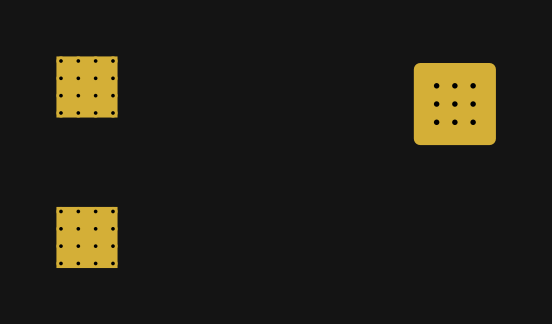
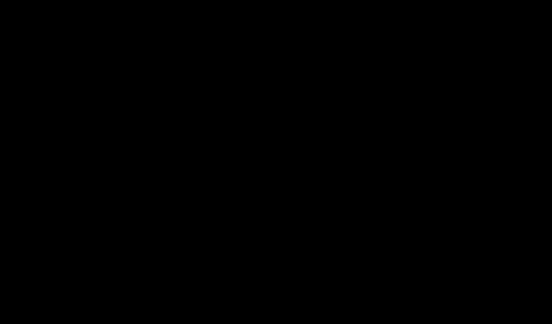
part: (86, 86) -> none
part: (454, 104) -> none
part: (86, 237) -> none

